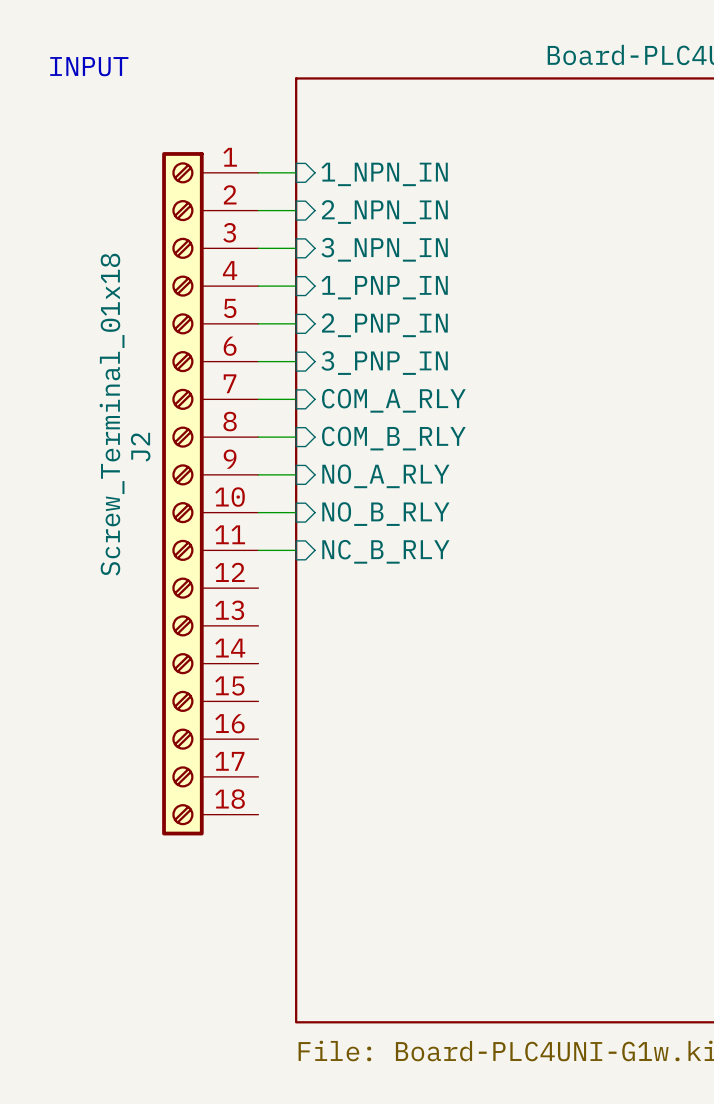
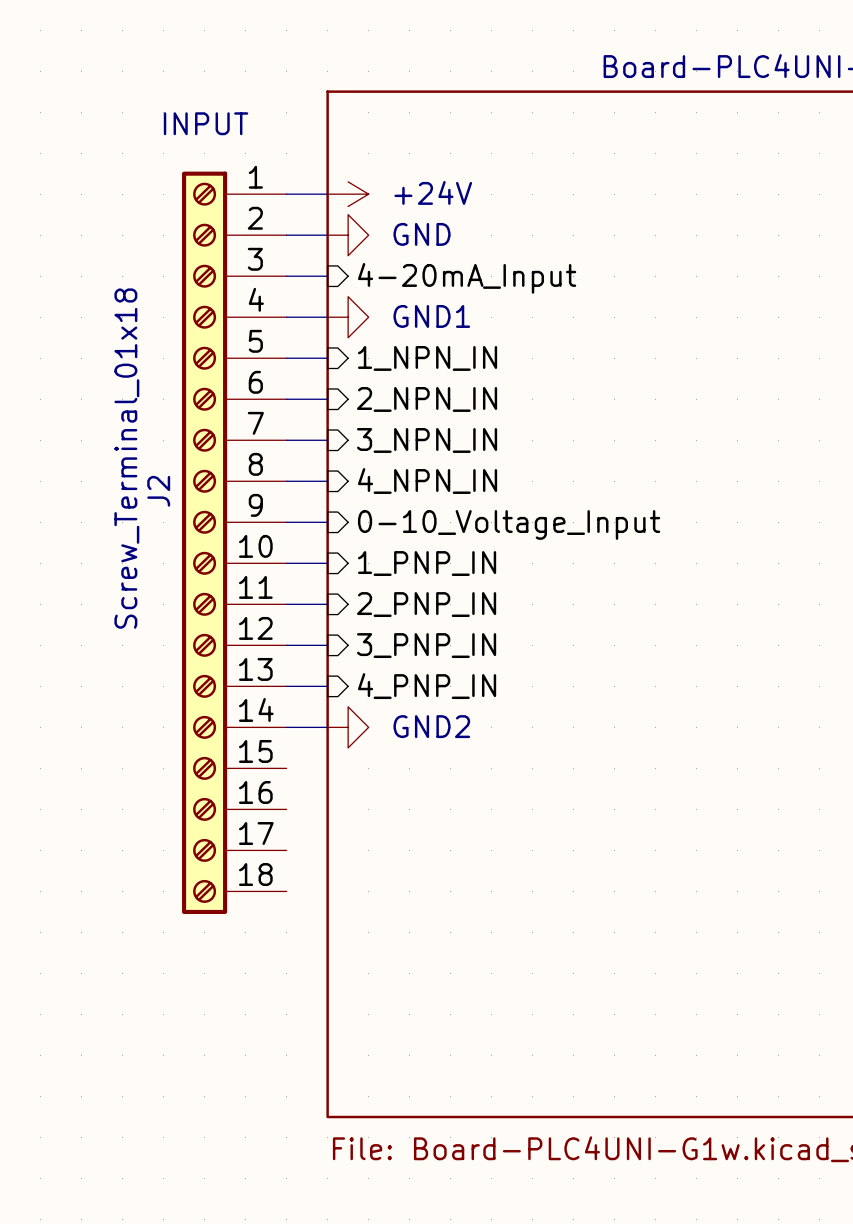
text position: INPUT (89, 66) -> INPUT (206, 123)
power symbol: none -> +24V (348, 194)
sheet pin: 1_NPN_IN (384, 174) -> none
power symbol: none -> GND (348, 235)
sheet pin: 2_NPN_IN (384, 212) -> none
sheet pin: 3_NPN_IN (384, 249) -> 4-20mA_Input (467, 278)
power symbol: none -> GND1 (348, 317)
sheet pin: 1_PNP_IN (384, 287) -> none
sheet pin: 2_PNP_IN (384, 325) -> 1_NPN_IN (427, 358)
sheet pin: 3_PNP_IN (384, 363) -> 2_NPN_IN (427, 399)
sheet pin: COM_A_RLY (393, 400) -> 3_NPN_IN (427, 440)
sheet pin: COM_B_RLY (393, 438) -> 4_NPN_IN (427, 481)
sheet pin: NO_A_RLY (385, 476) -> 0-10_Voltage_Input (509, 524)
sheet pin: NO_B_RLY (385, 514) -> 1_PNP_IN (427, 563)
sheet pin: NC_B_RLY (385, 551) -> 2_PNP_IN (426, 604)
wire: none -> (286, 645) (327, 645)
sheet pin: none -> 3_PNP_IN (426, 645)
wire: none -> (286, 686) (327, 686)
sheet pin: none -> 4_PNP_IN (427, 686)
wire: none -> (286, 727) (327, 727)
power symbol: none -> GND2 (348, 727)

